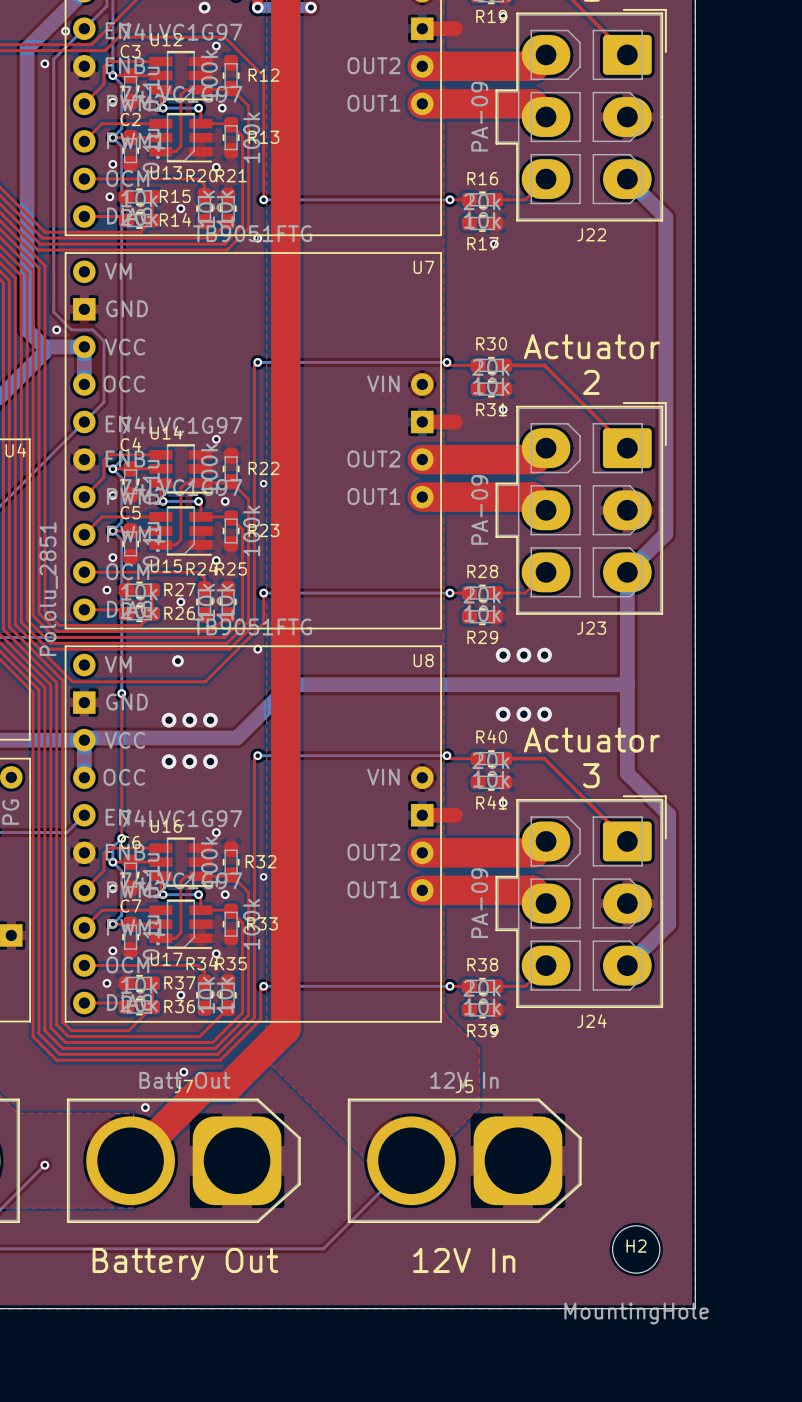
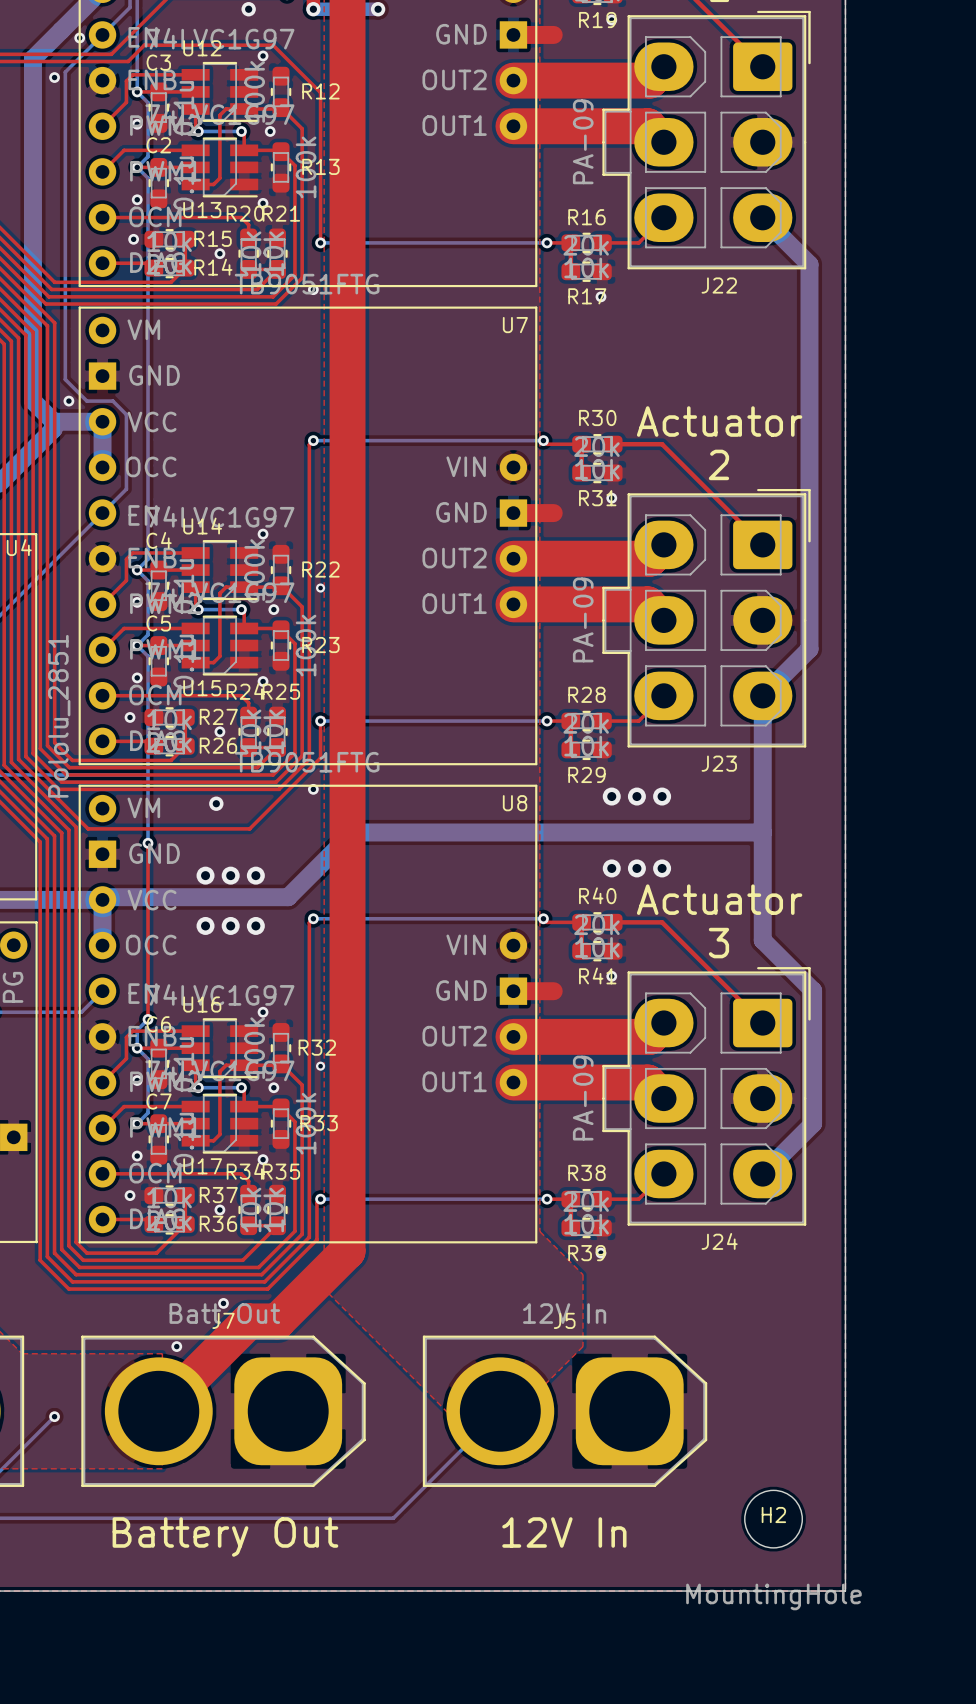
part text: none -> GND (461, 34)
U7 text: none -> GND (461, 512)
U8 text: none -> GND (461, 990)

